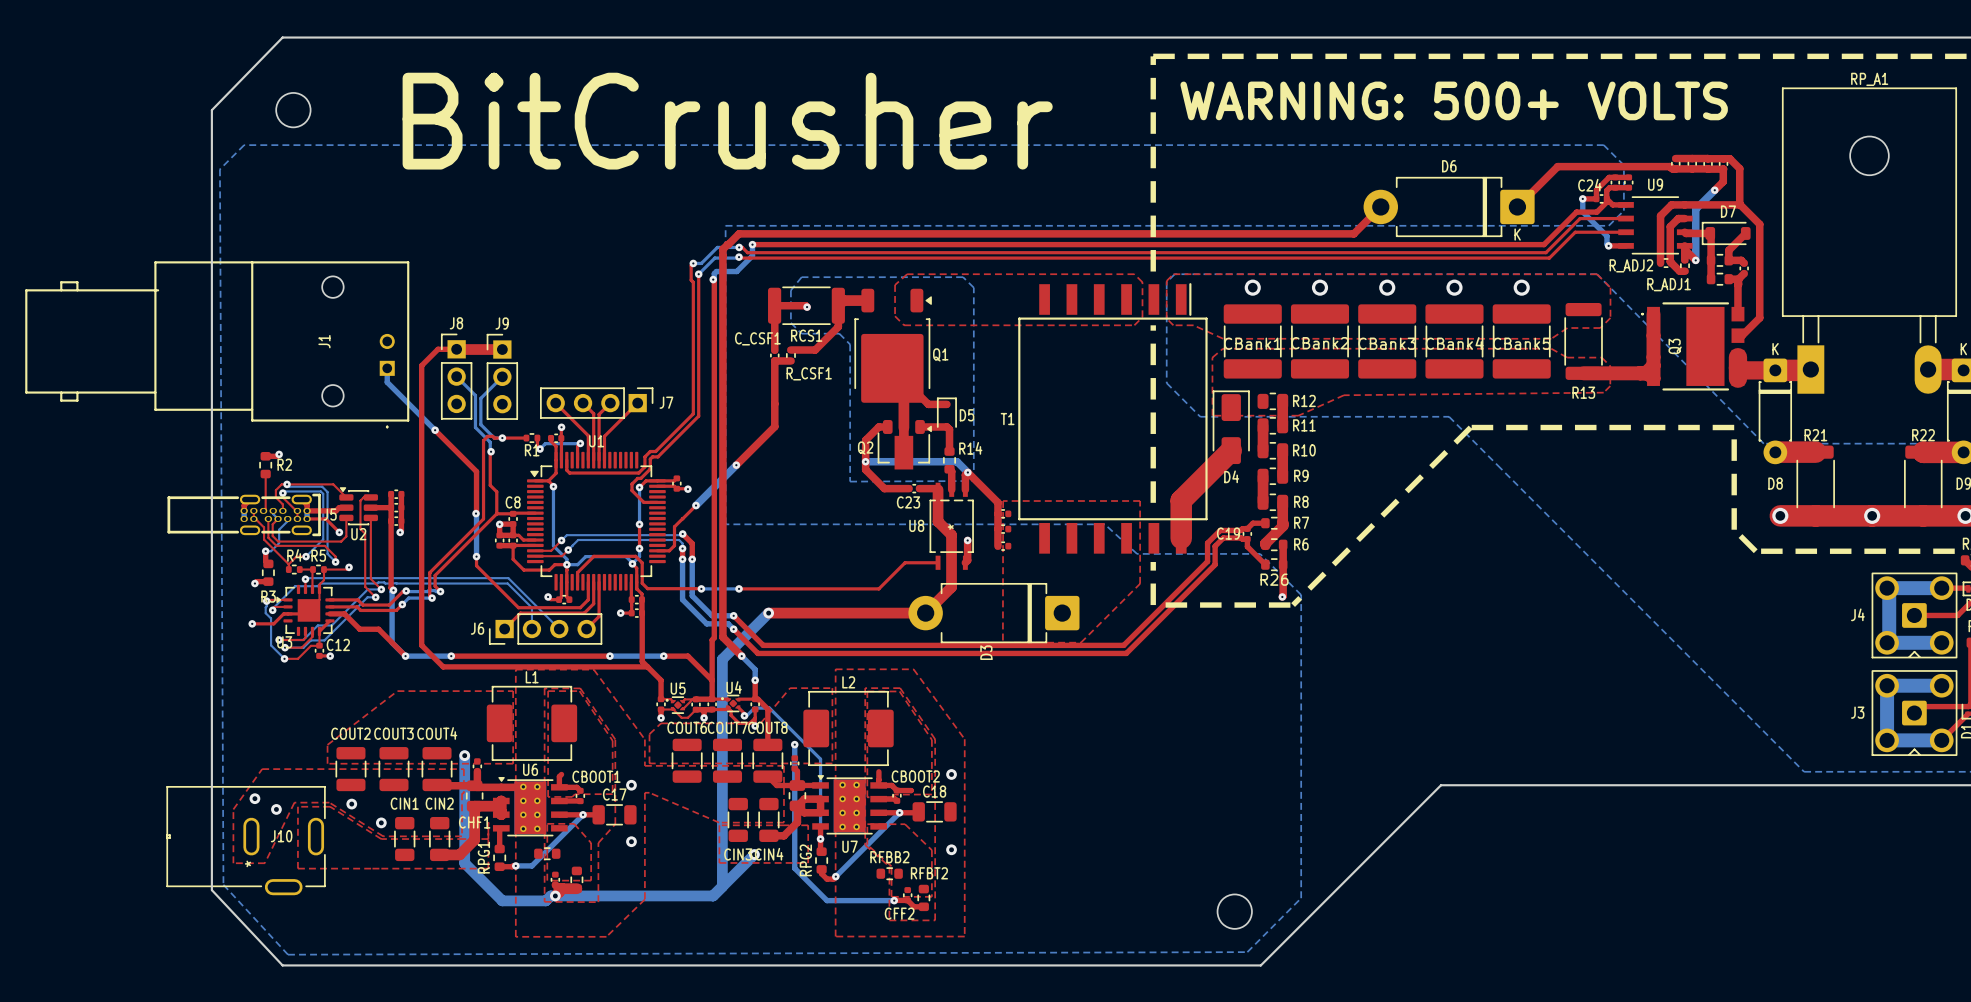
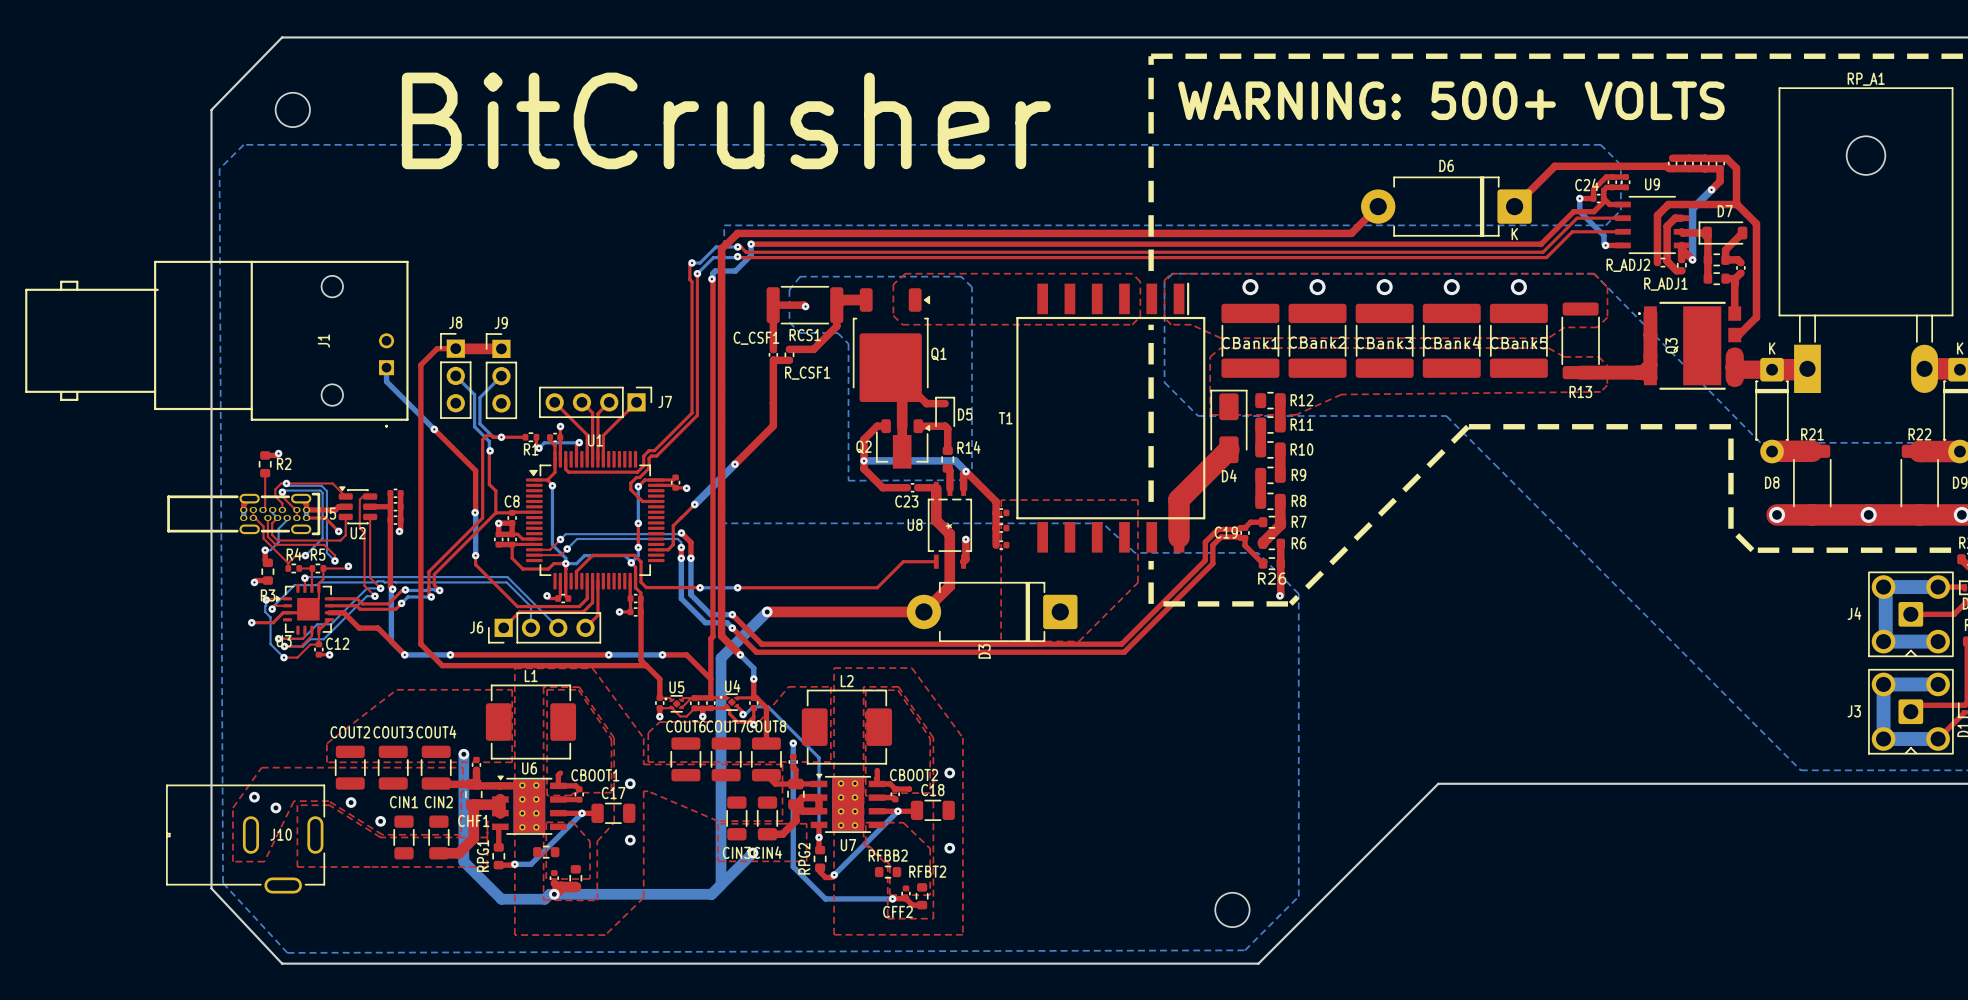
J10 text: * (247, 863) -> none

